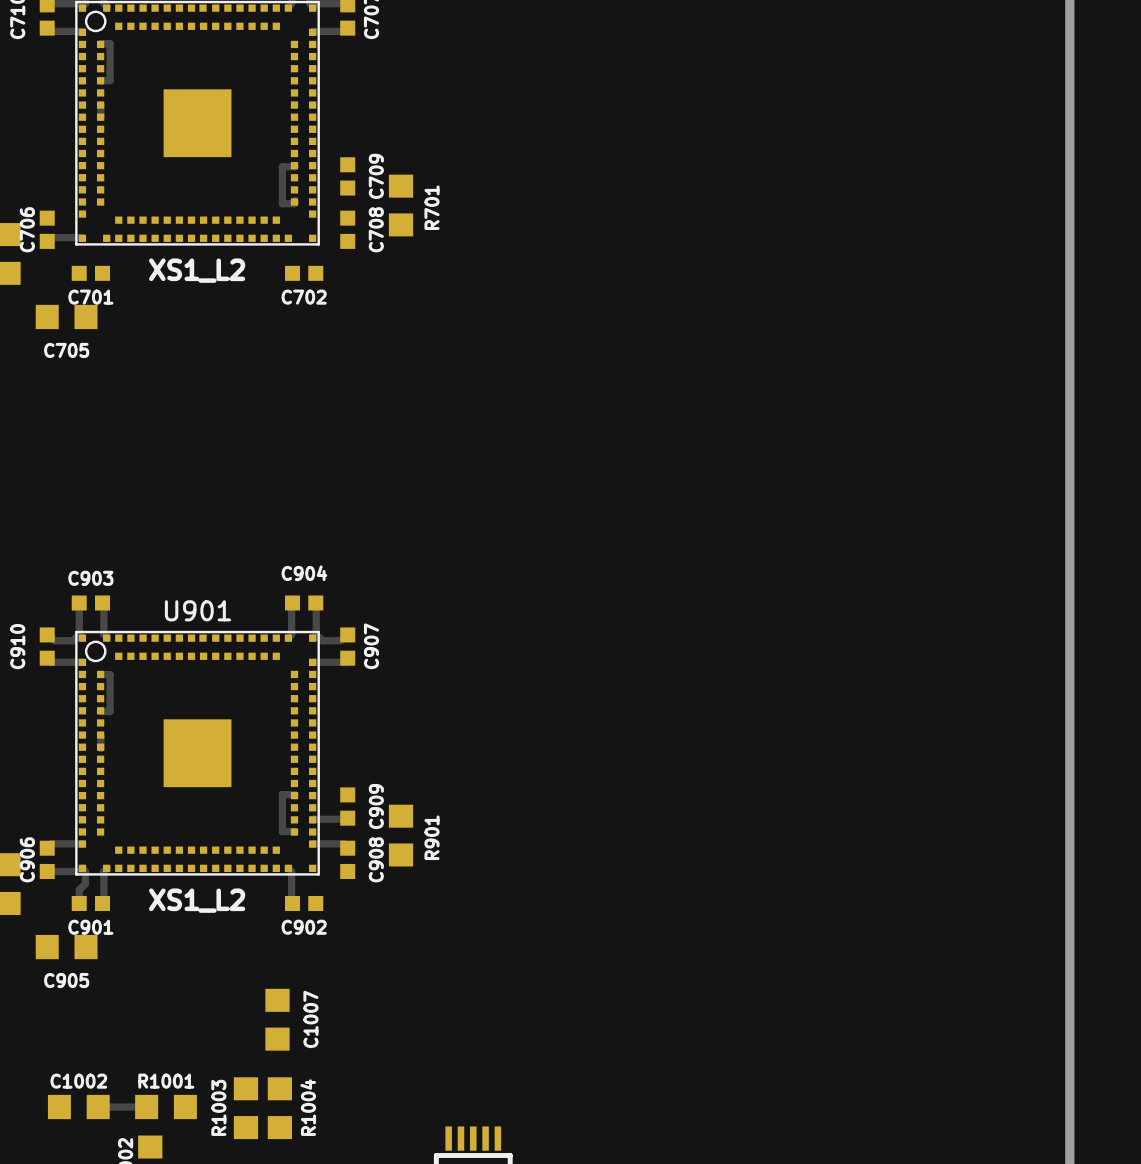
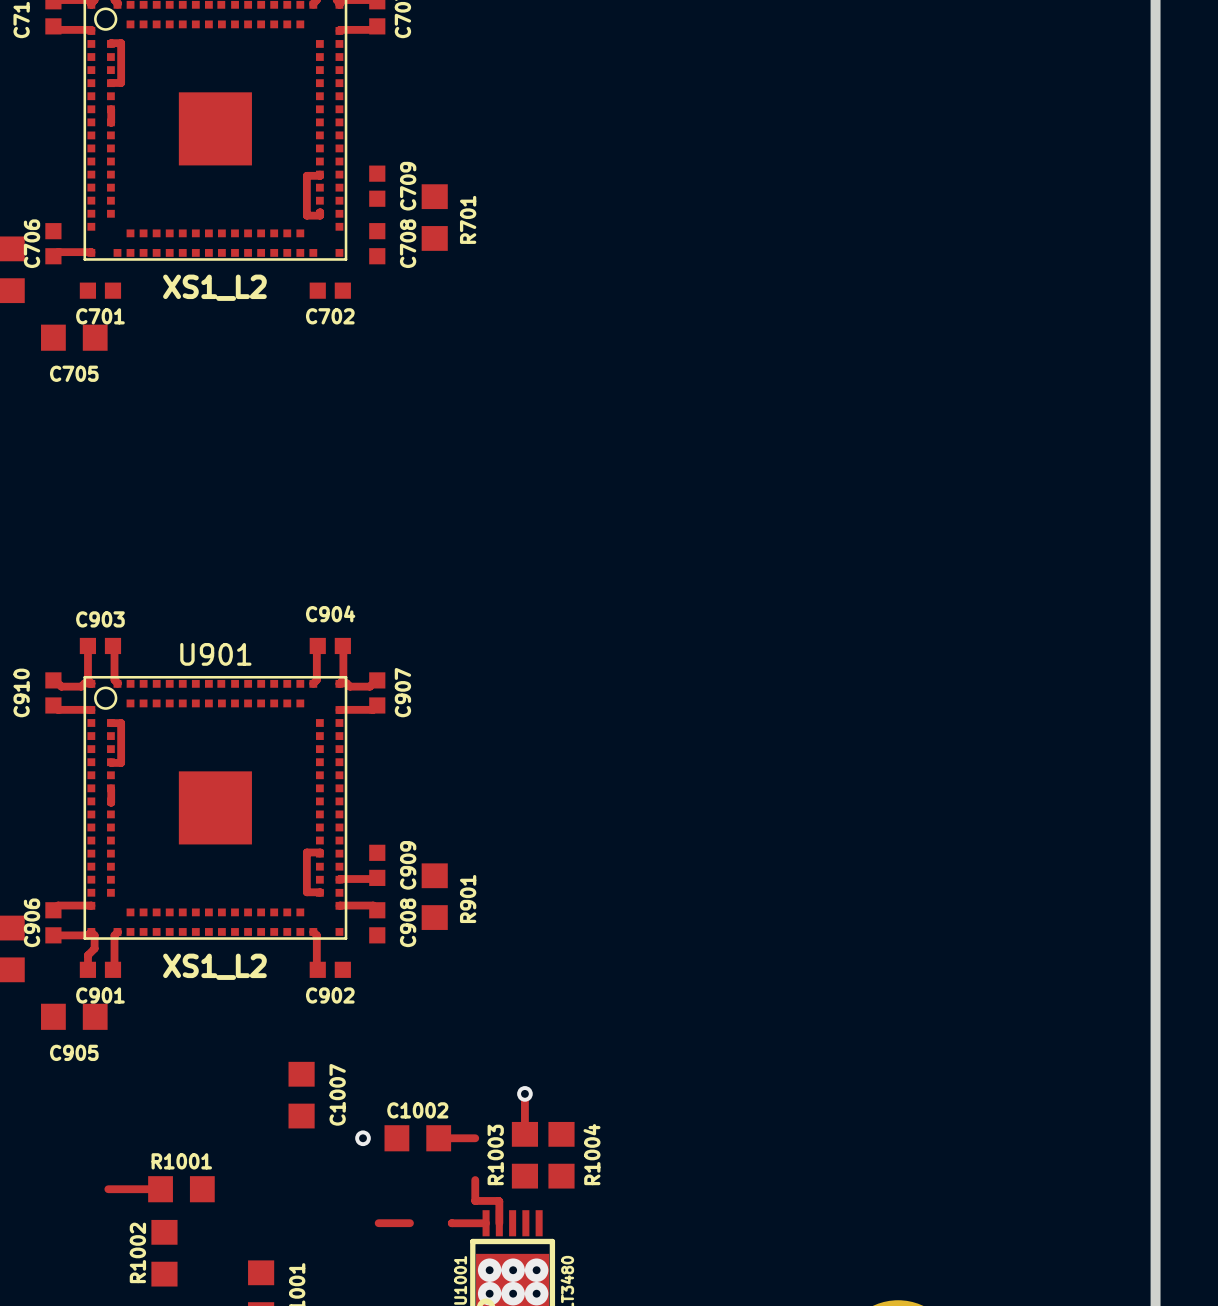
track: none -> (524, 1093) (524, 1134)
via: none -> (524, 1093)
via: none -> (363, 1138)
track: none -> (438, 1138) (475, 1138)
track: none -> (475, 1180) (475, 1200) (499, 1201) (499, 1223)
C1002 position: (78, 1107) -> (417, 1138)
R1003 position: (245, 1108) -> (524, 1155)
R1004 position: (279, 1108) -> (561, 1155)
track: none -> (378, 1223) (409, 1223)
track: none -> (451, 1223) (486, 1223)

